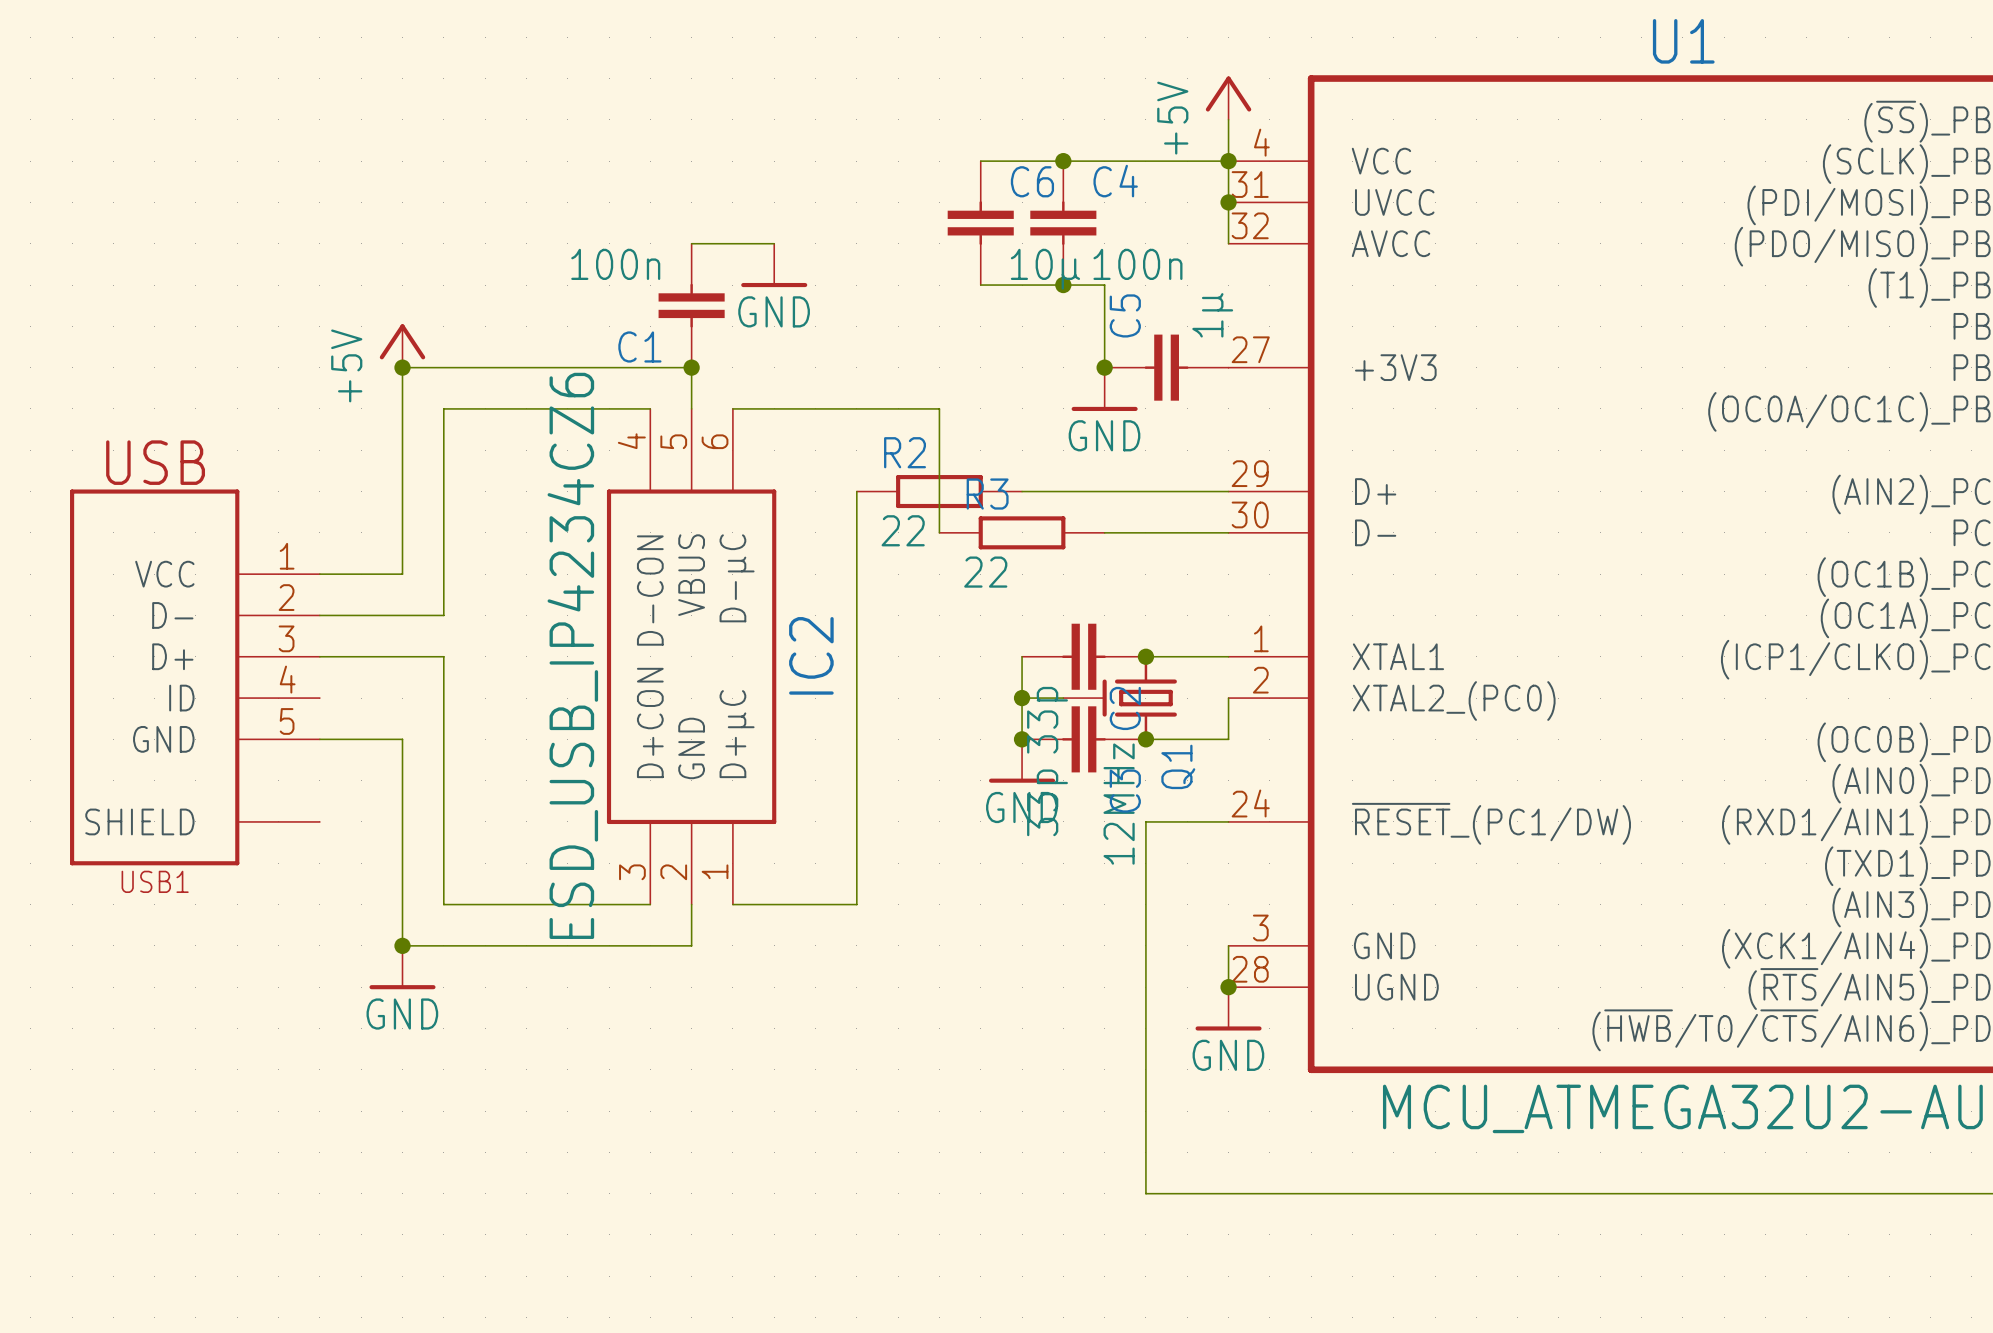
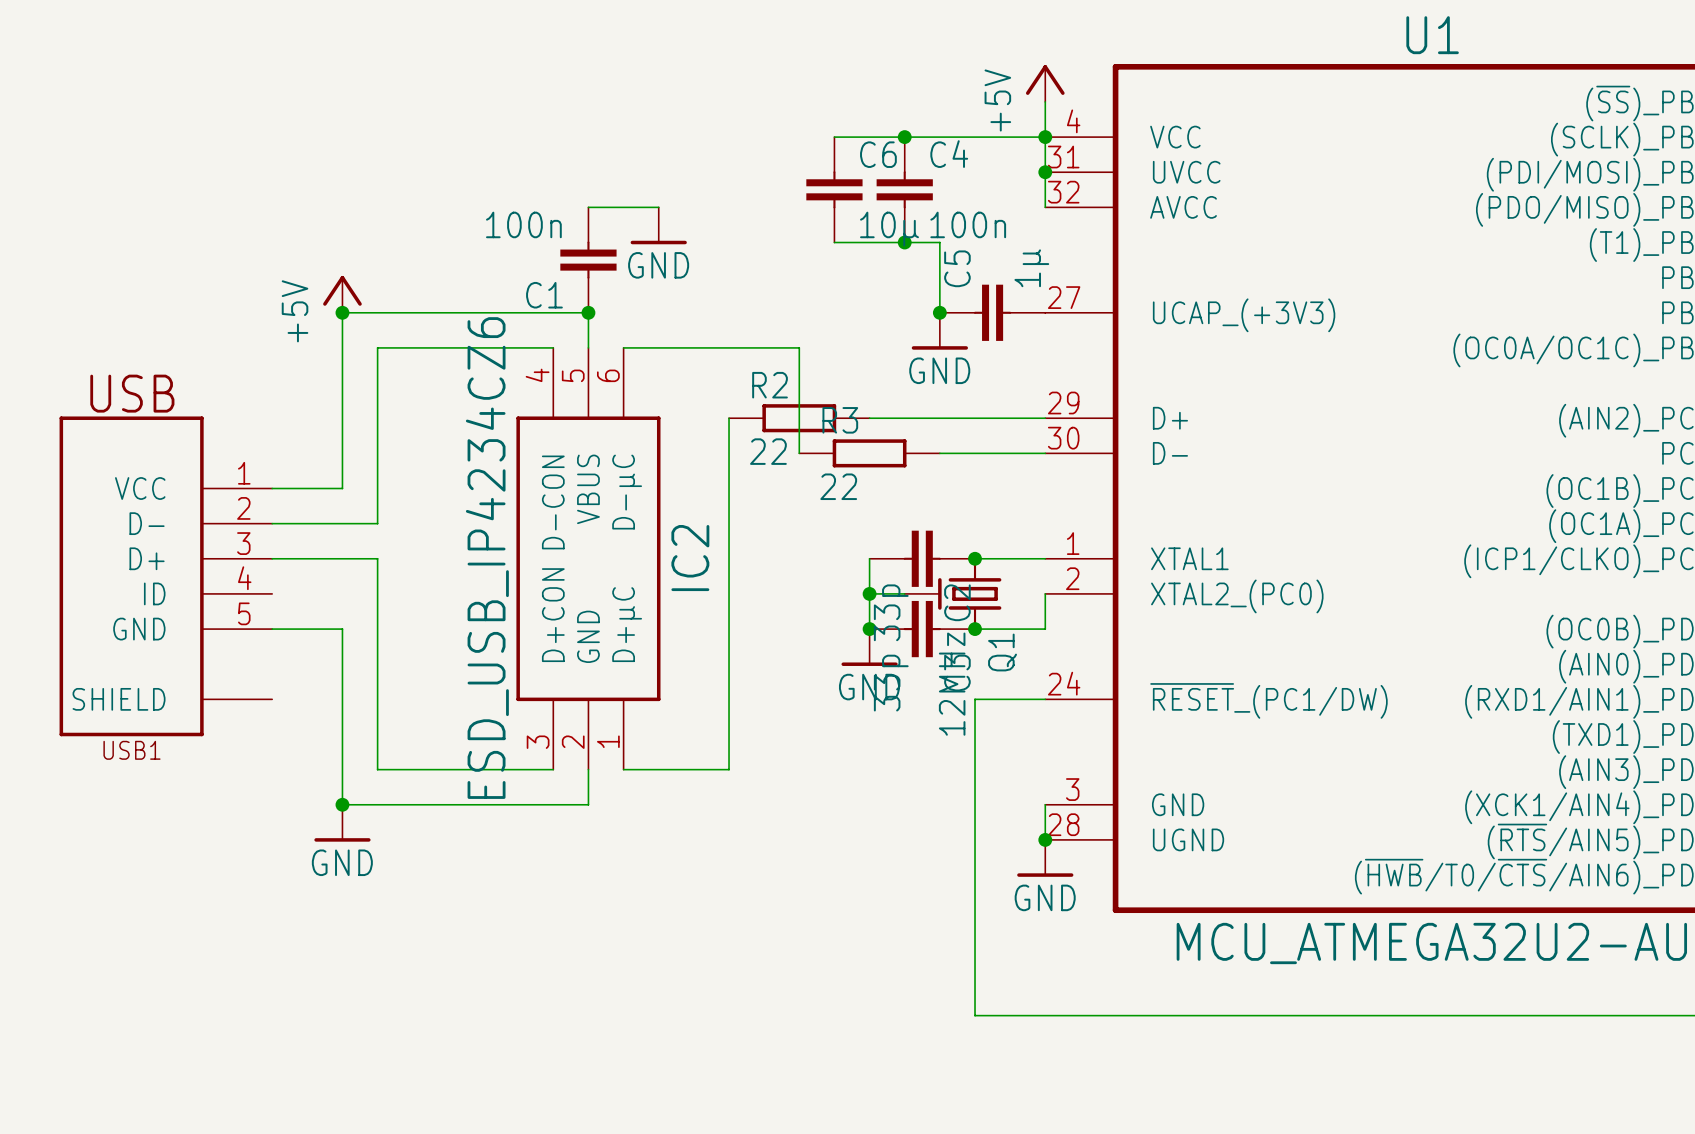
U1 pin name: +3V3 (1395, 367) -> UCAP_(+3V3) (1244, 315)

